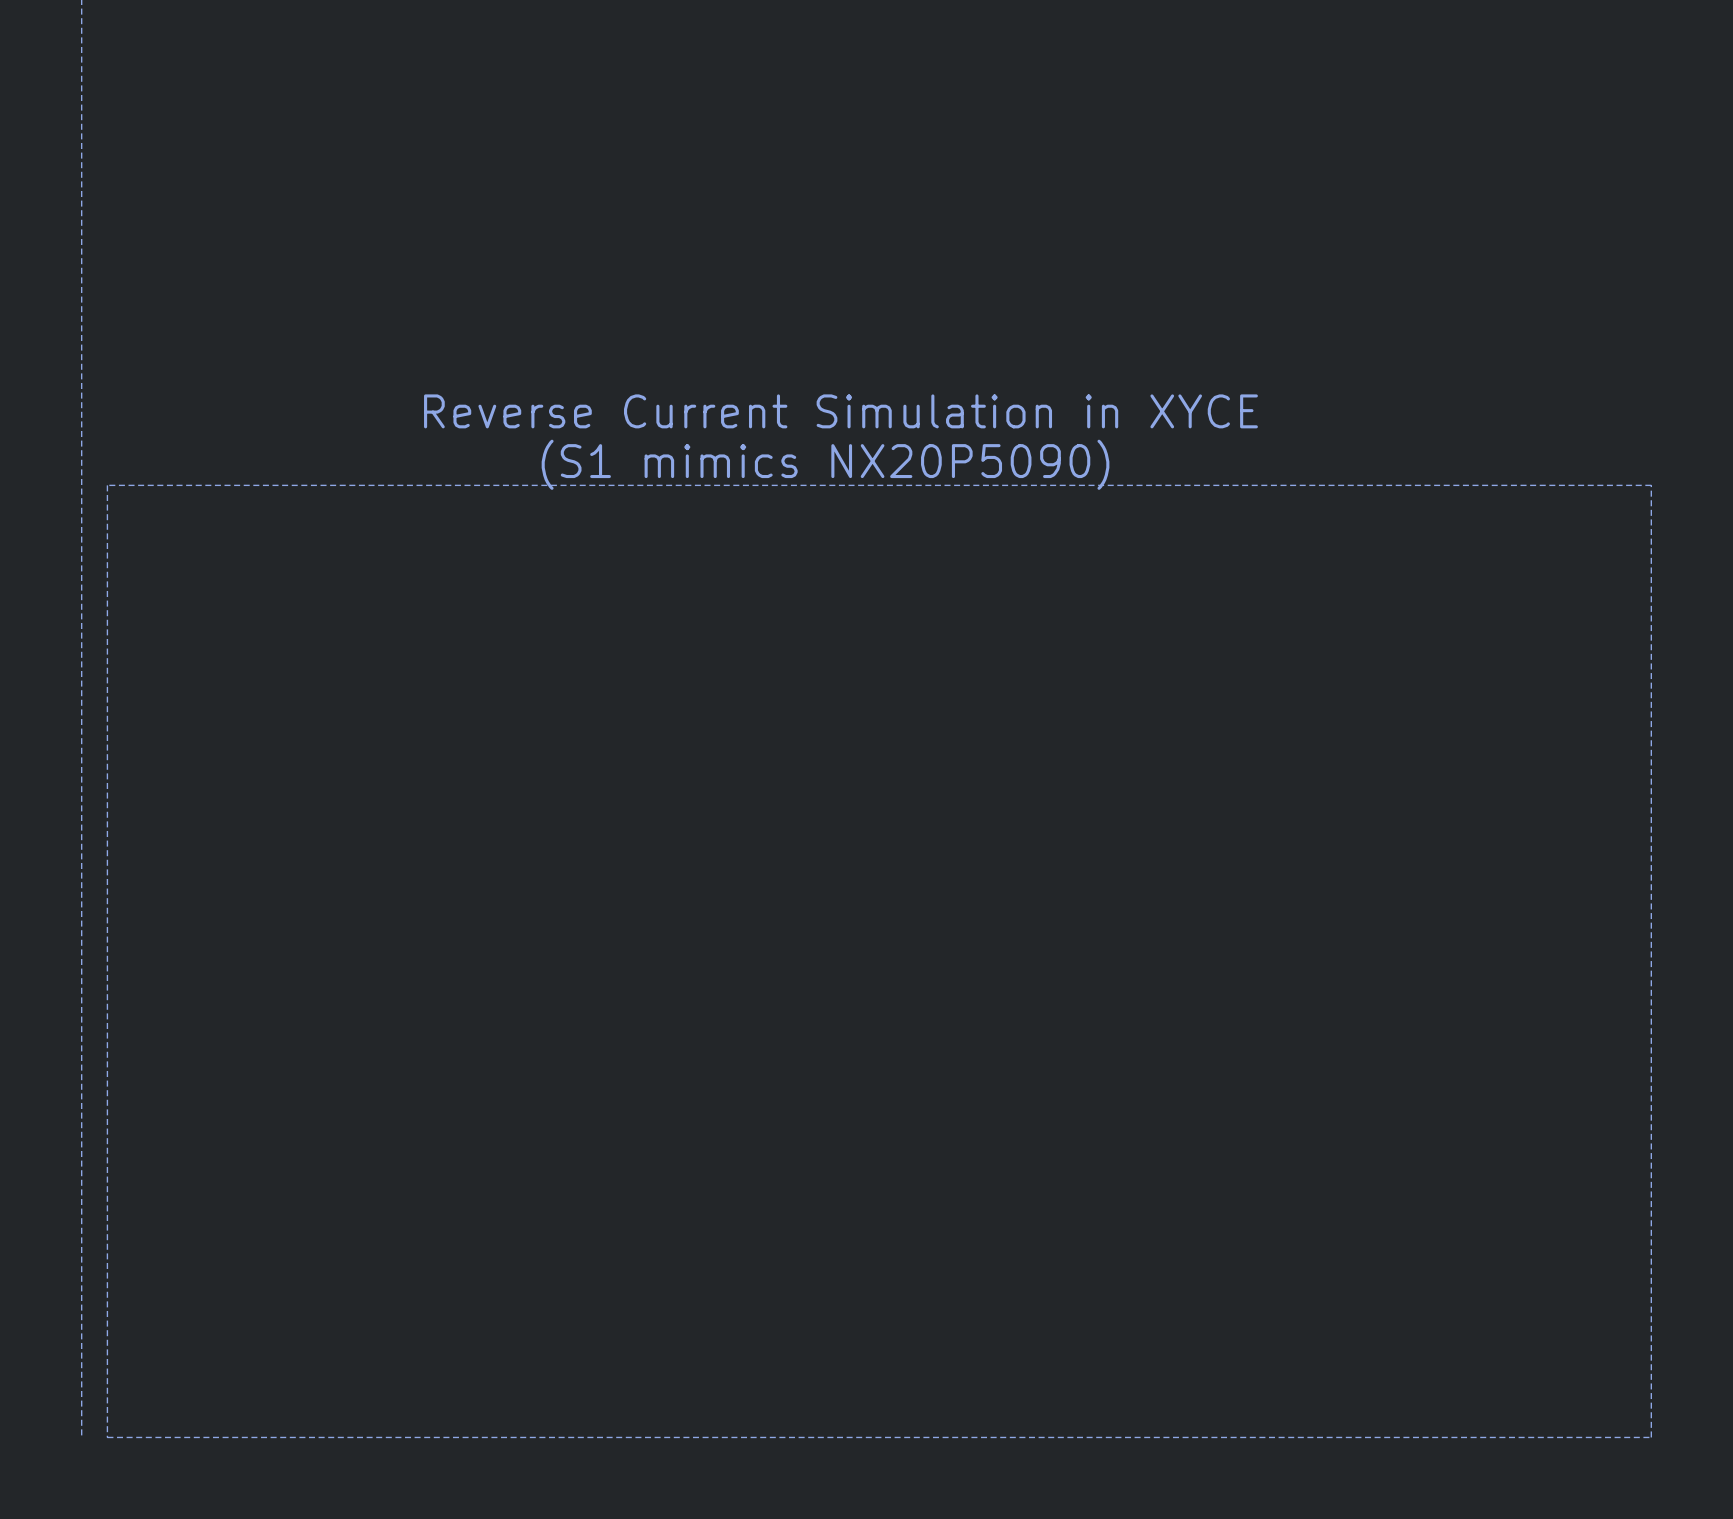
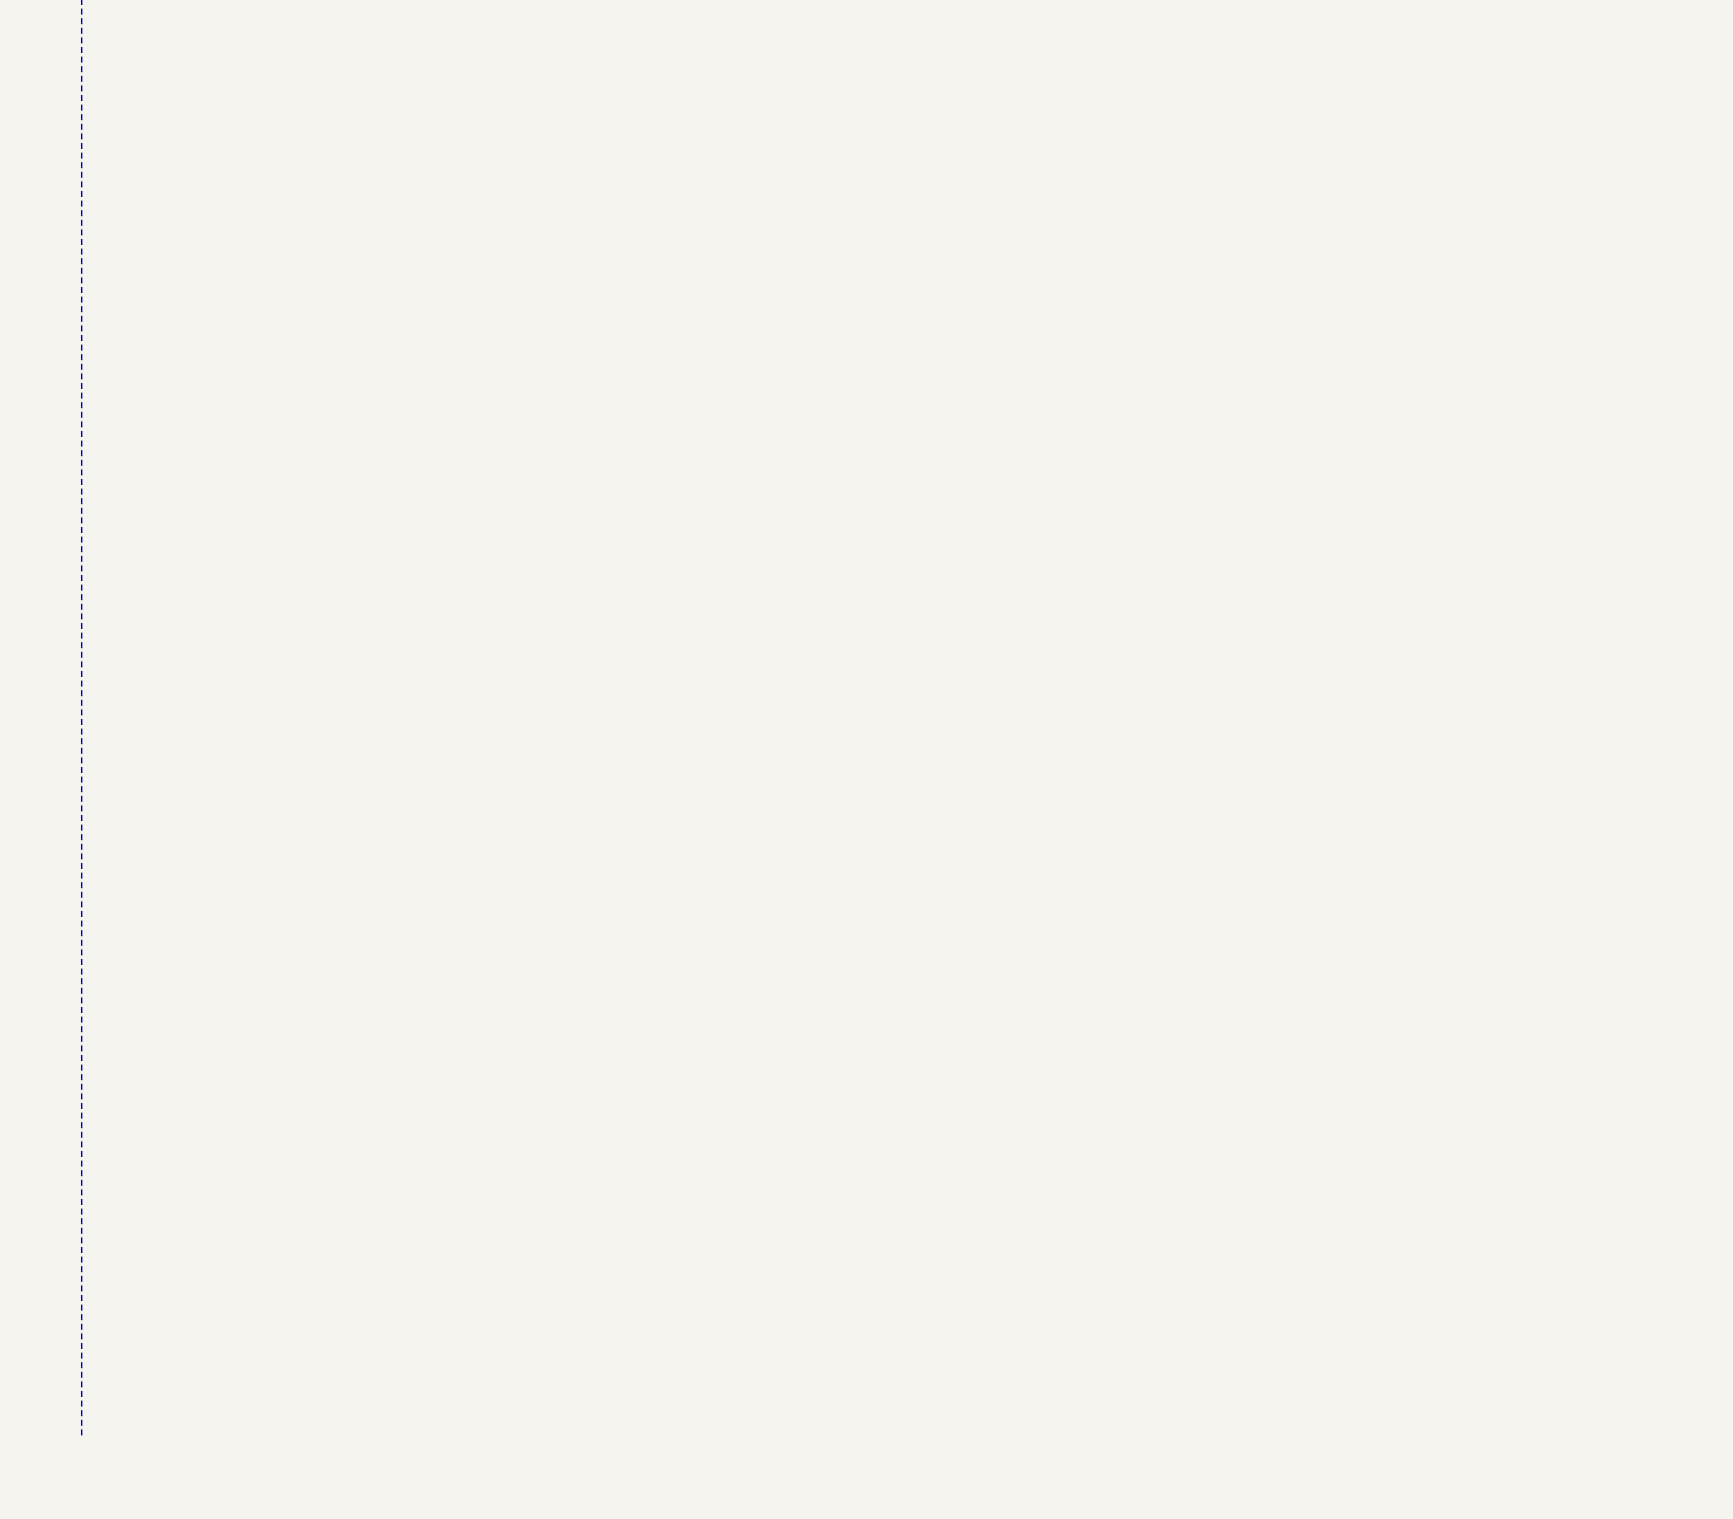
text: Reverse Current Simulation in XYCE (840, 411) -> none
text: (S1 mimics NX20P5090) (825, 464) -> none
line: (107, 485) (1651, 485) (1651, 1437) (107, 1437) (107, 485) -> none

